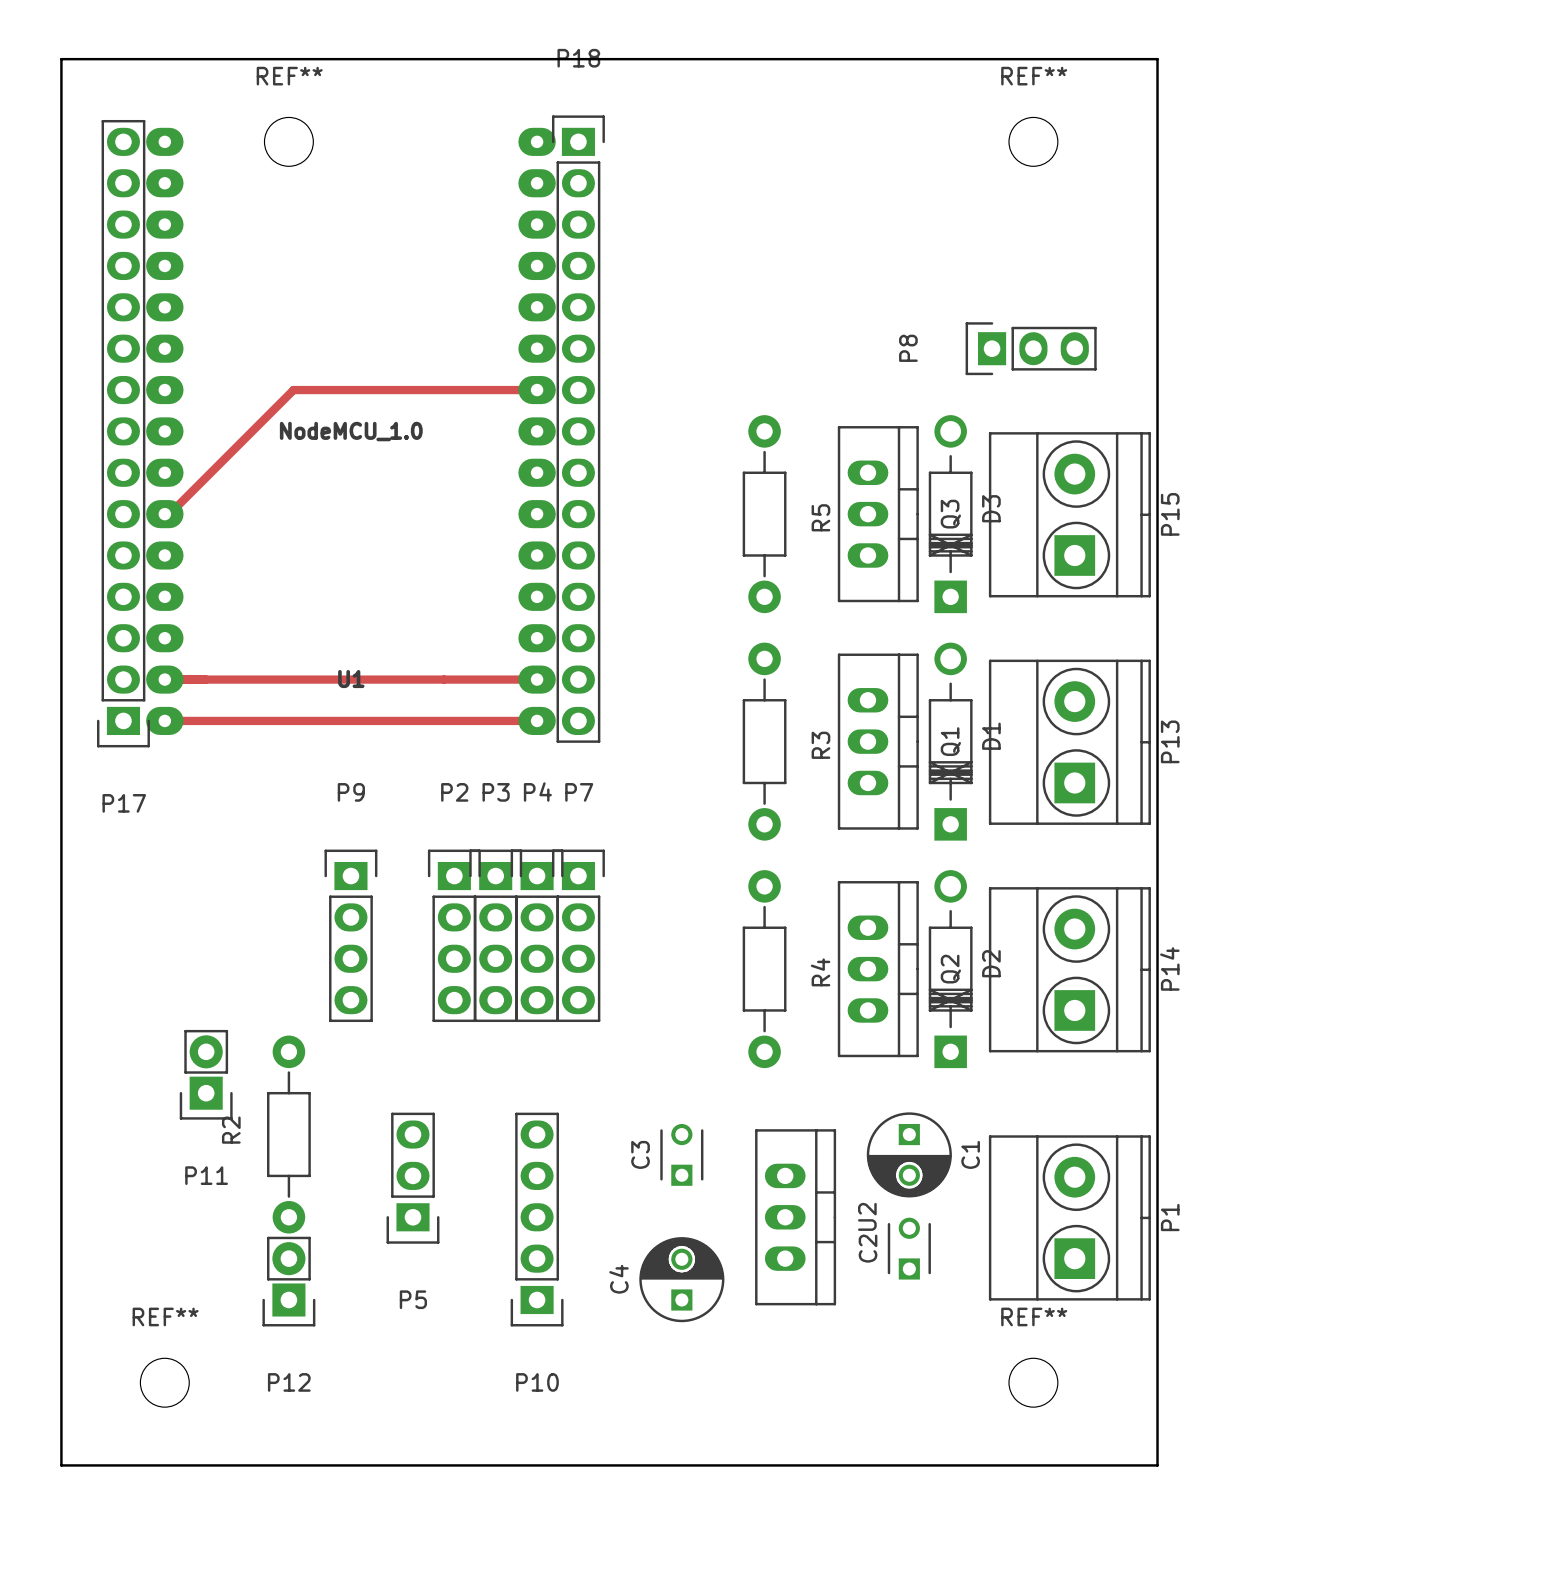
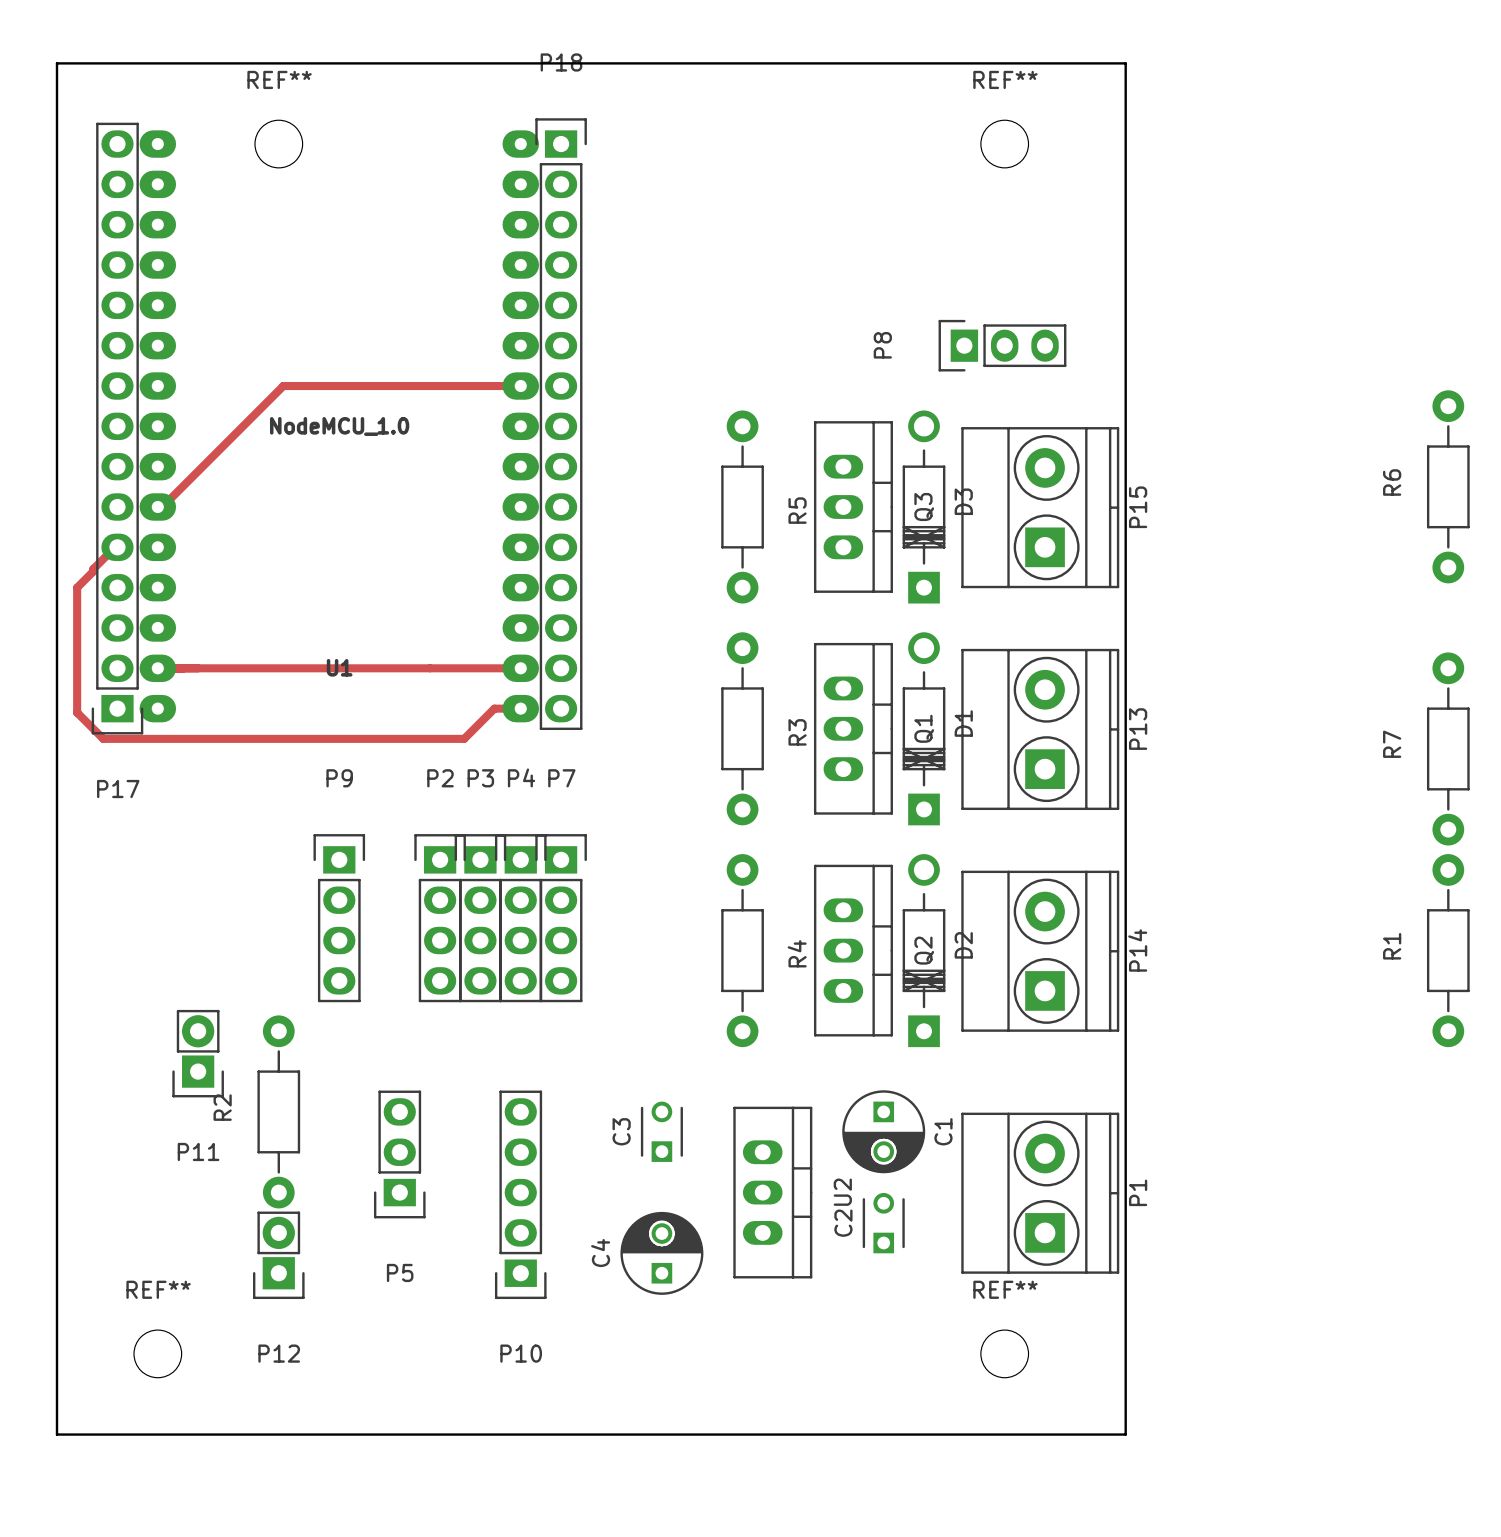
R6: none -> (1448, 486)
track: (164, 720) (510, 720) -> (117, 547) (115, 547) (93, 569) (93, 571) (77, 587) (77, 712) (103, 738) (464, 738) (494, 708)
R7: none -> (1448, 748)
R1: none -> (1448, 950)

